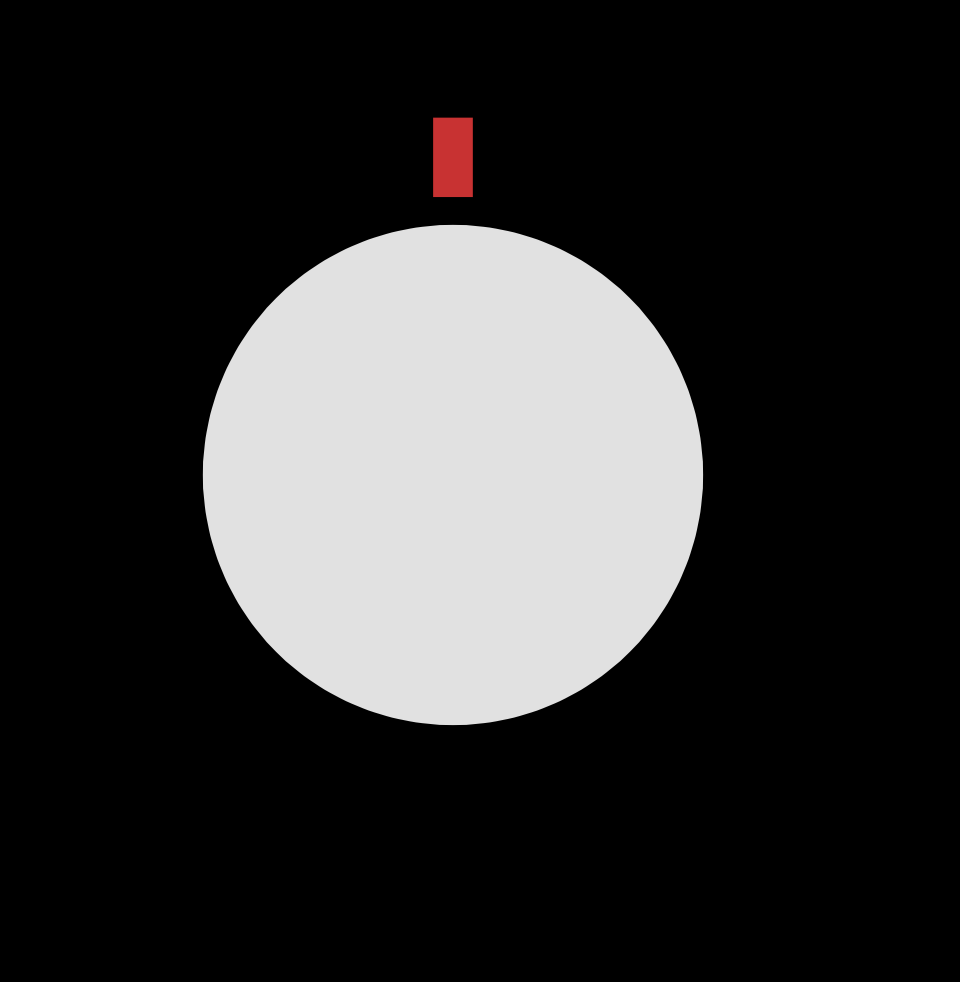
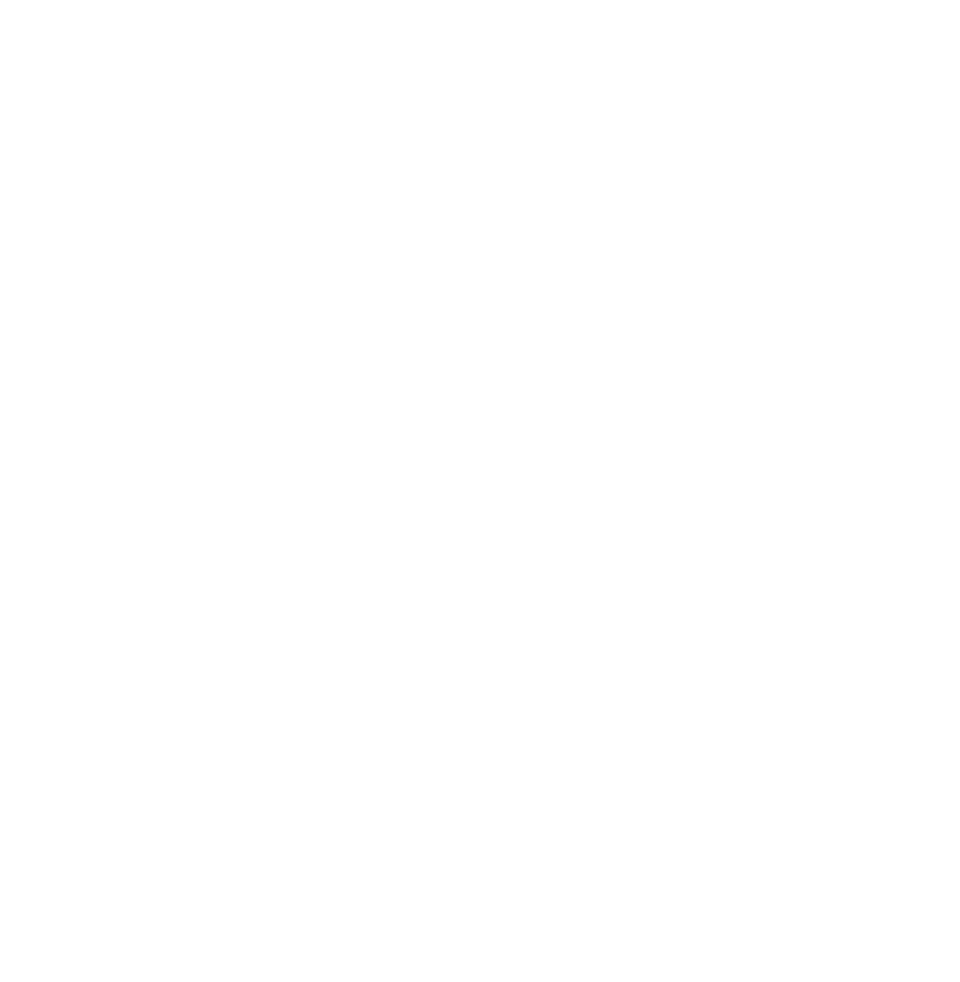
part: (452, 421) -> none

